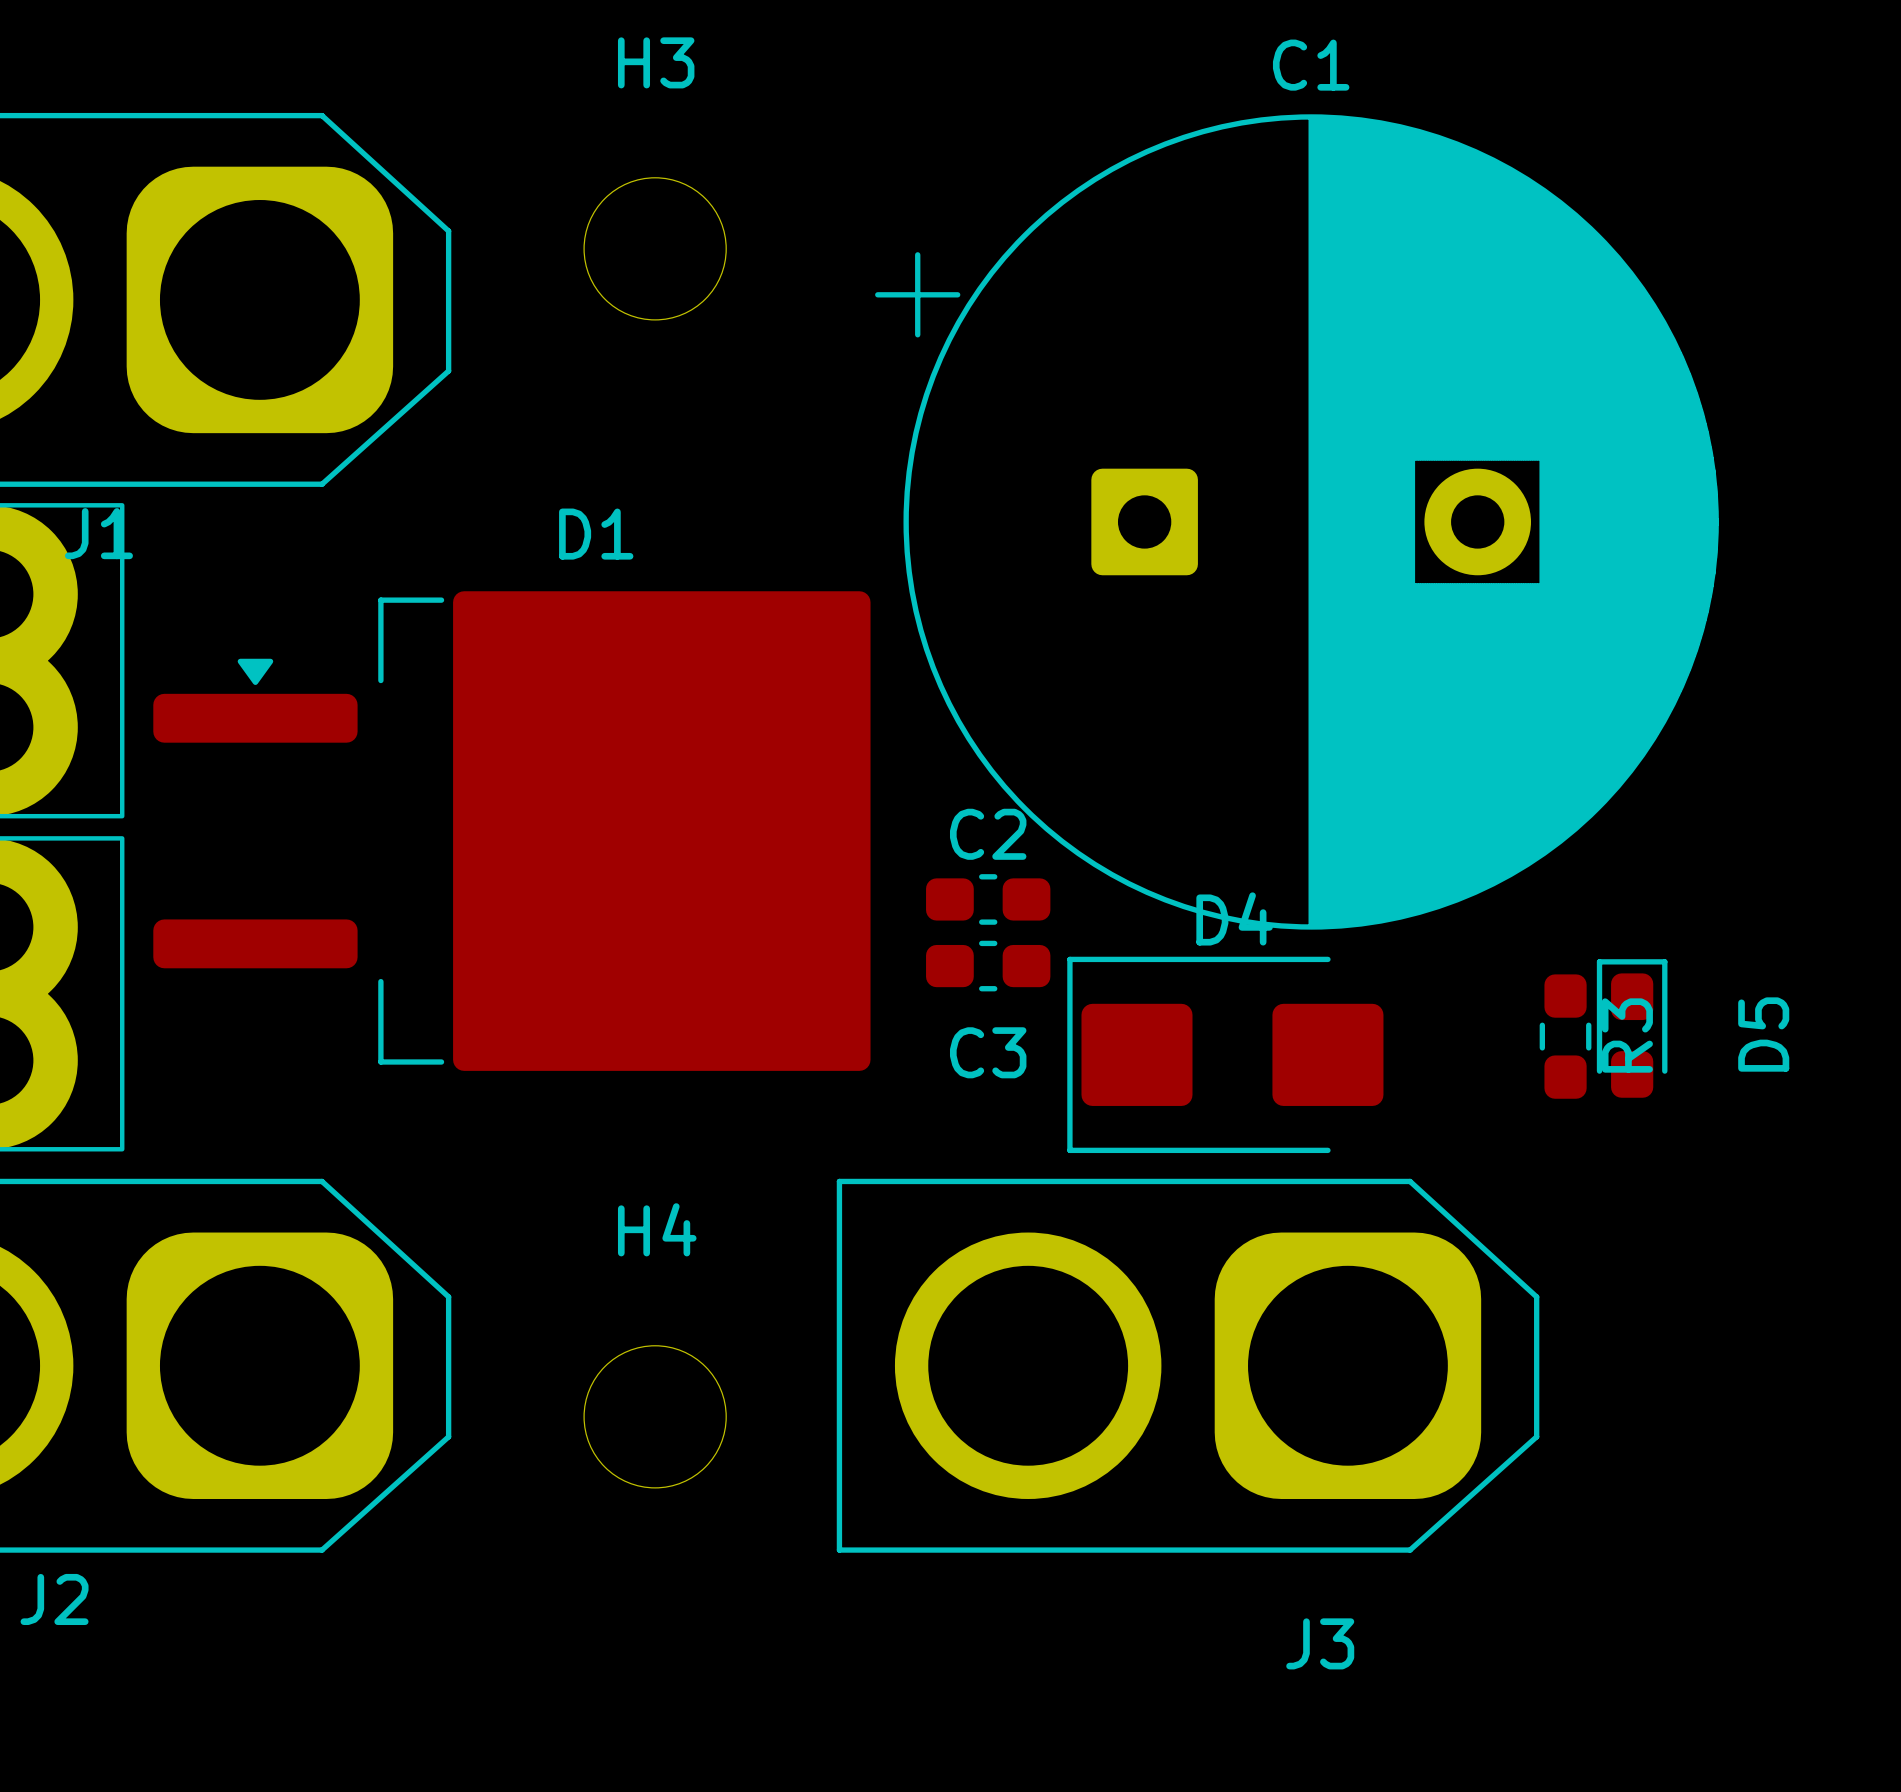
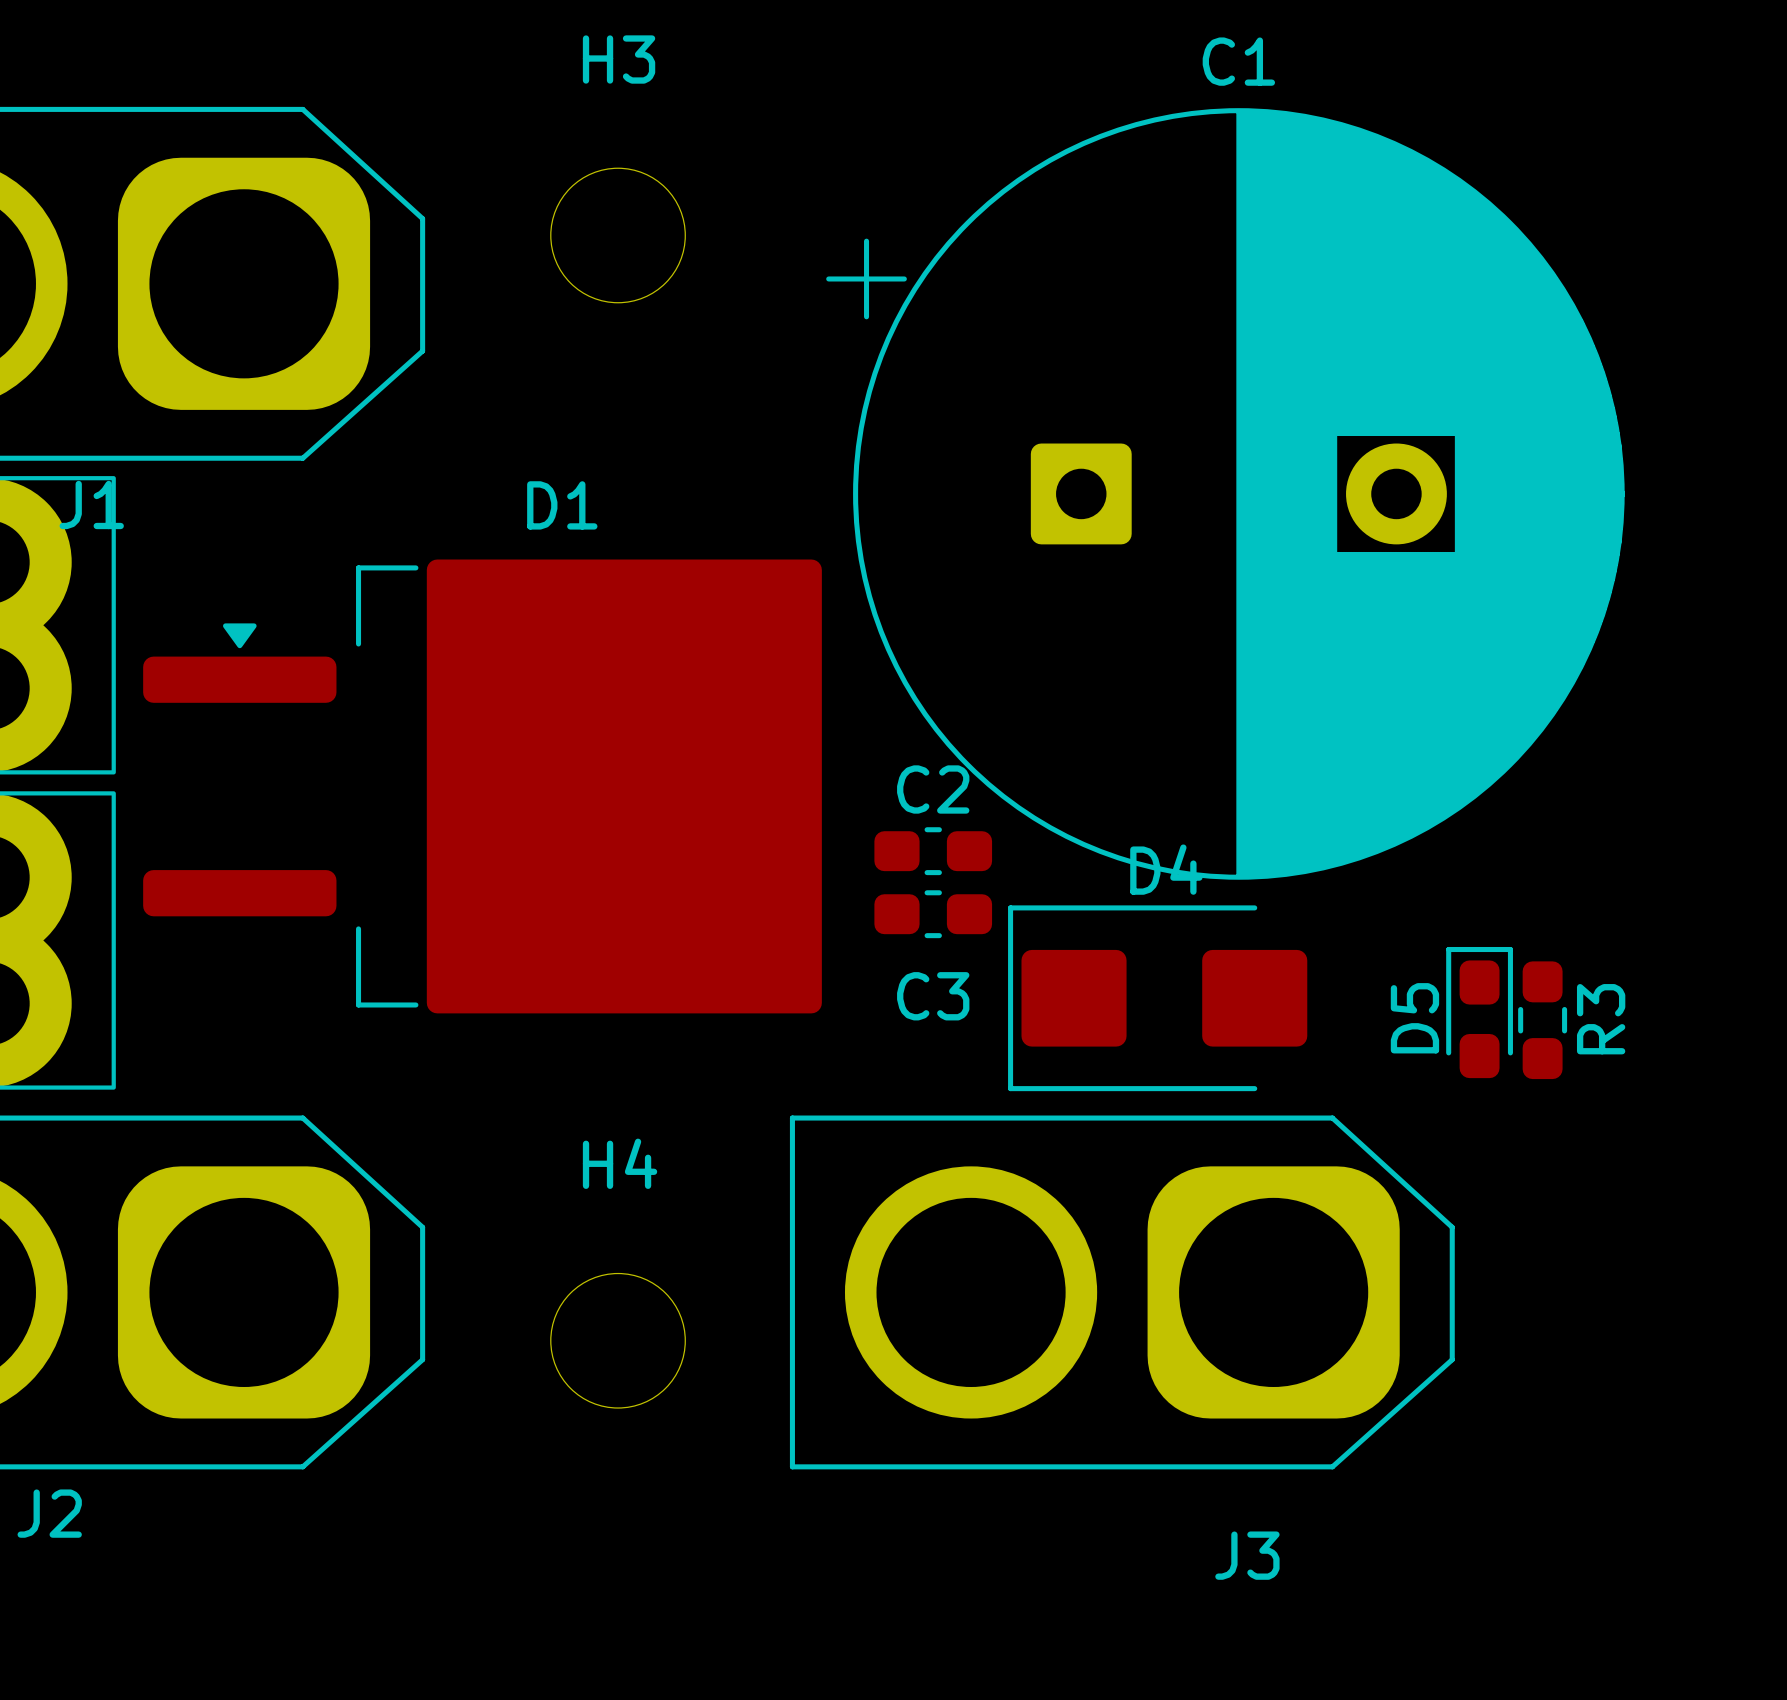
D5 position: (1632, 1028) -> (1479, 1012)
D5 name position: D5 (1763, 1034) -> D5 (1414, 1018)
R3 position: (1565, 1036) -> (1542, 1020)

